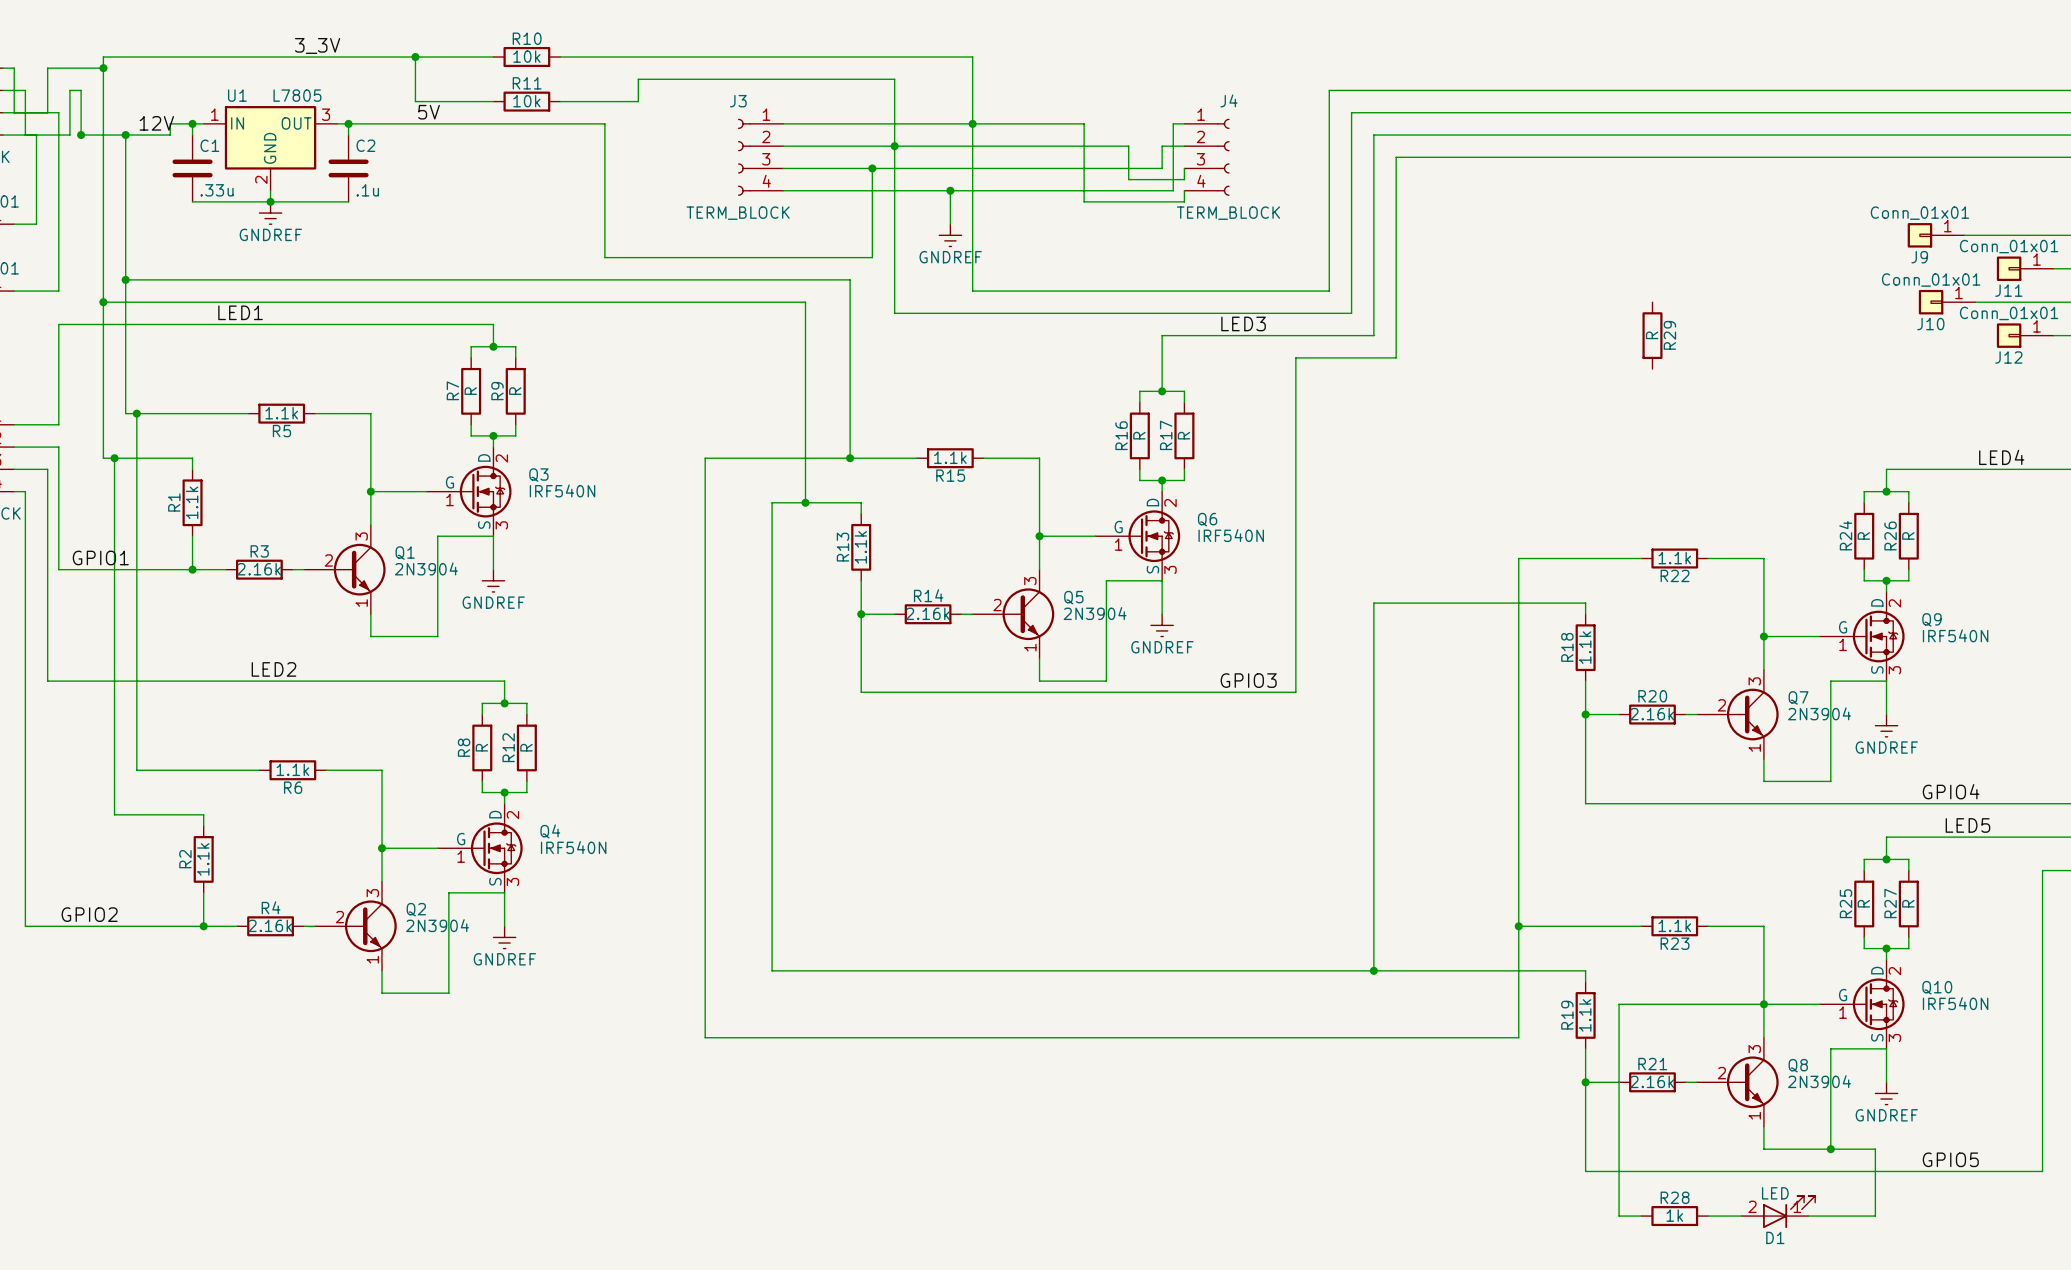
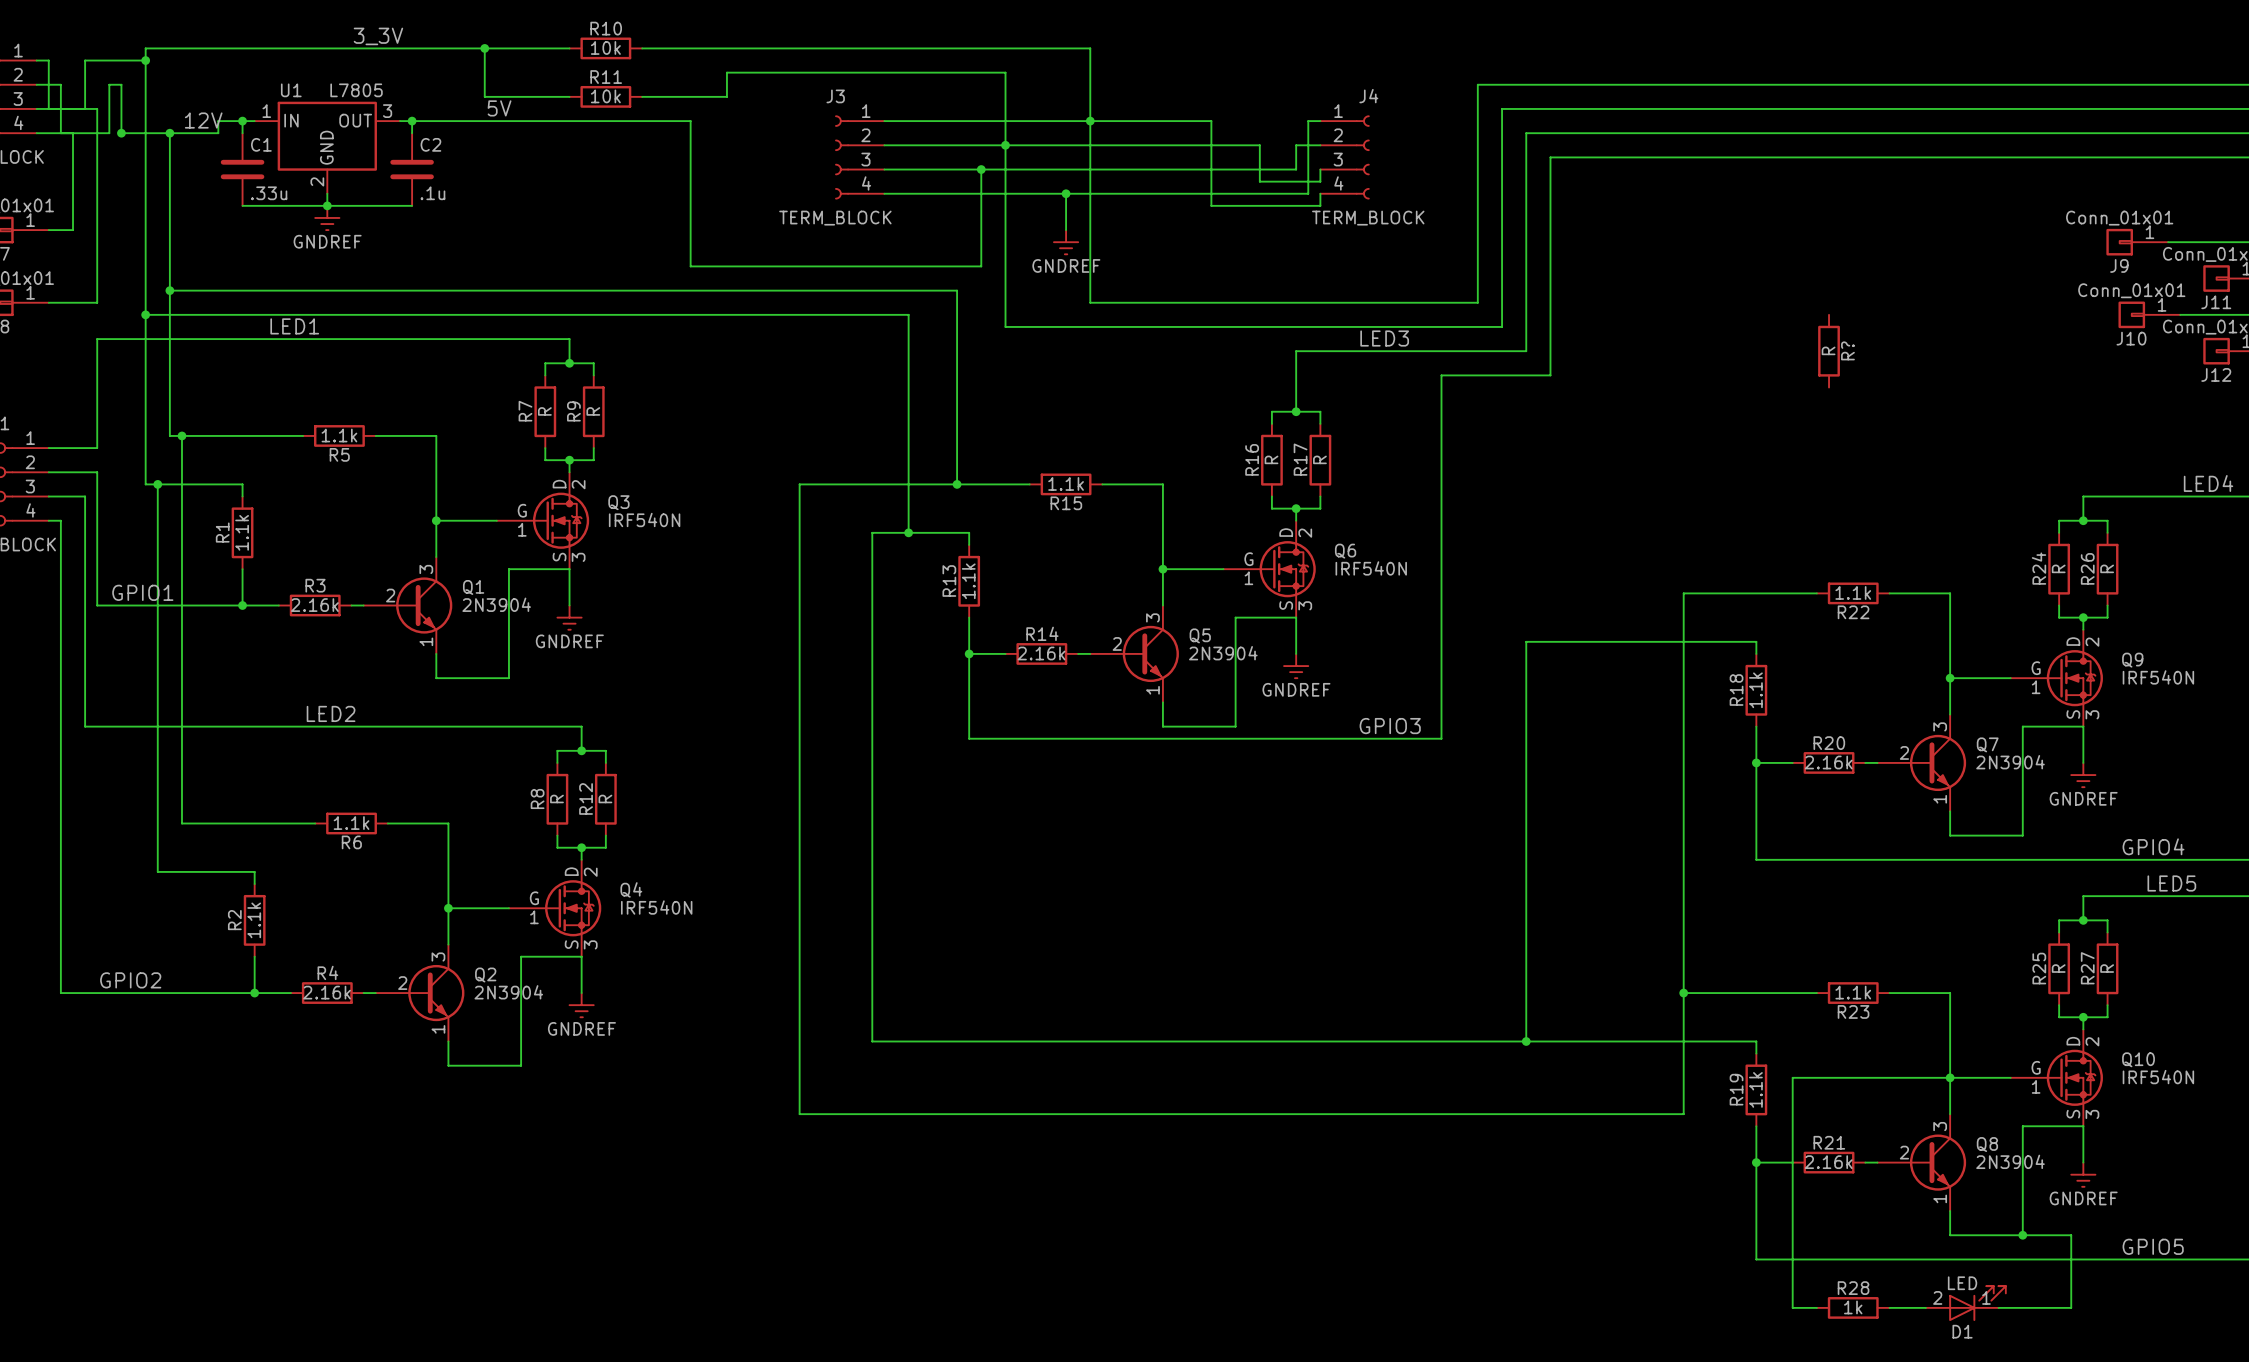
R29 name: R29 (1669, 335) -> R? (1847, 350)

